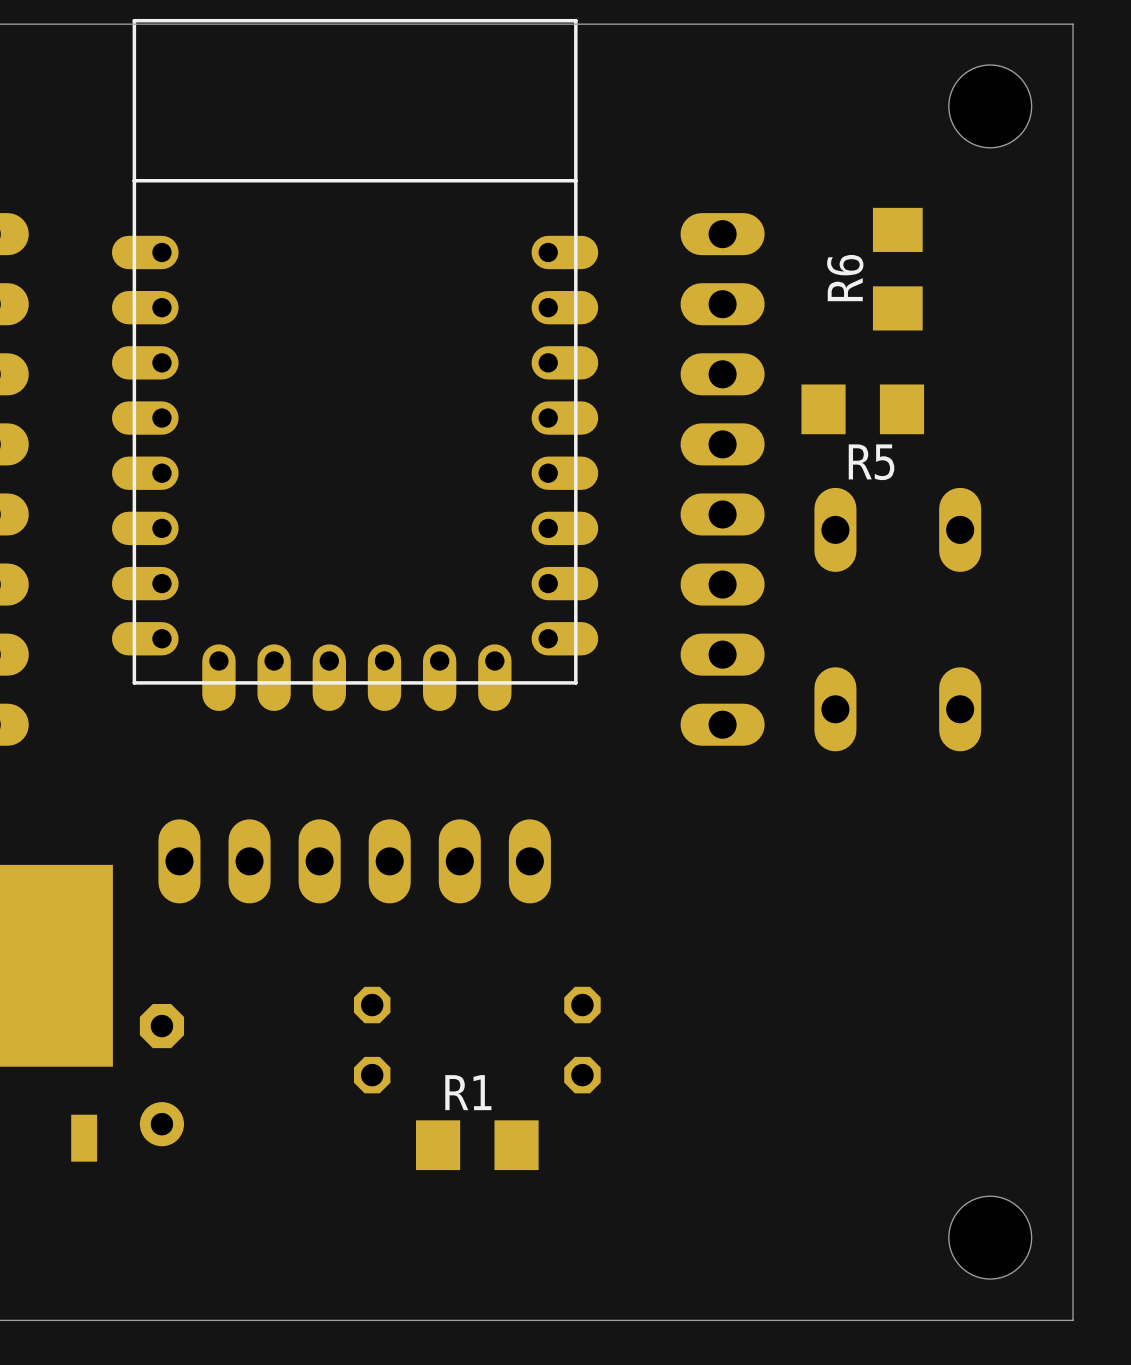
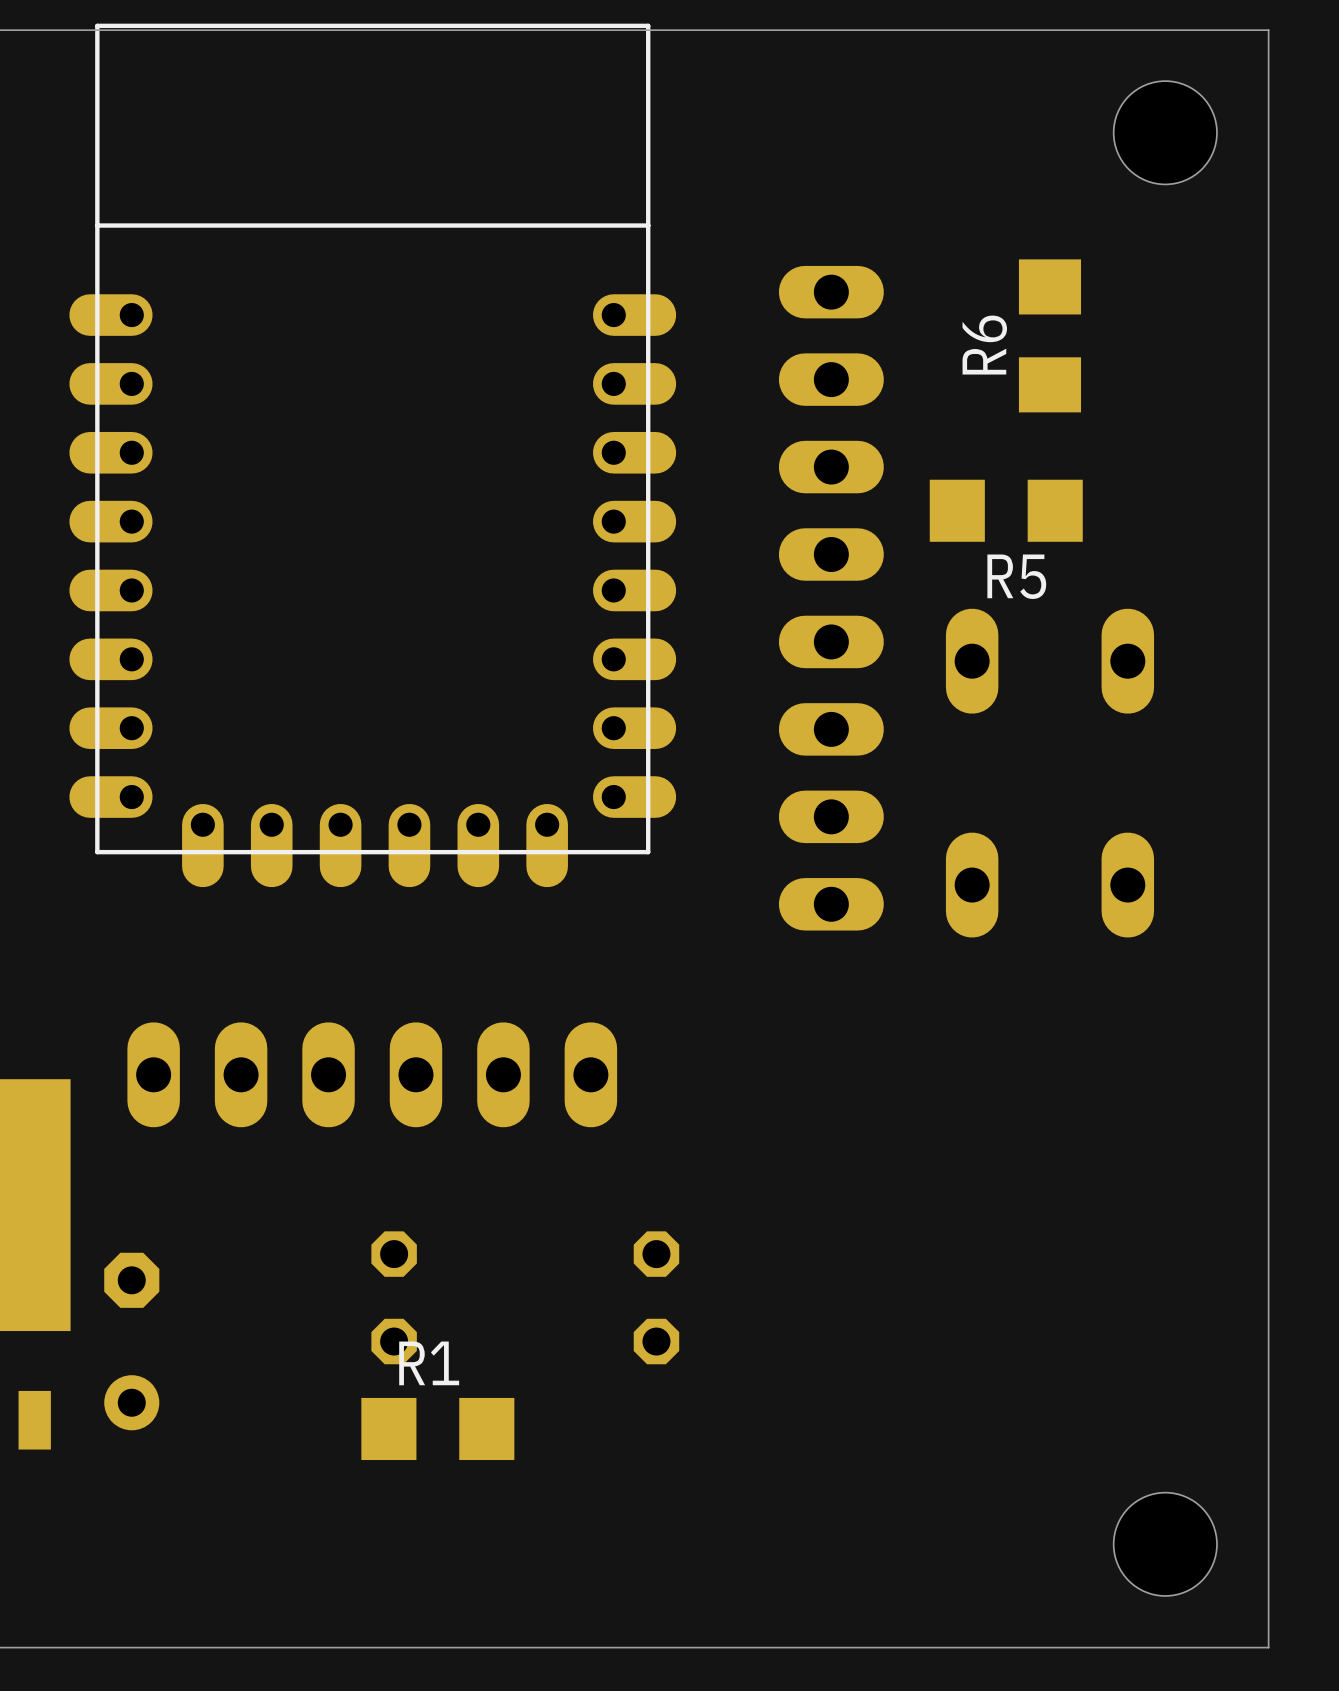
R1 position: (477, 1145) -> (437, 1428)

